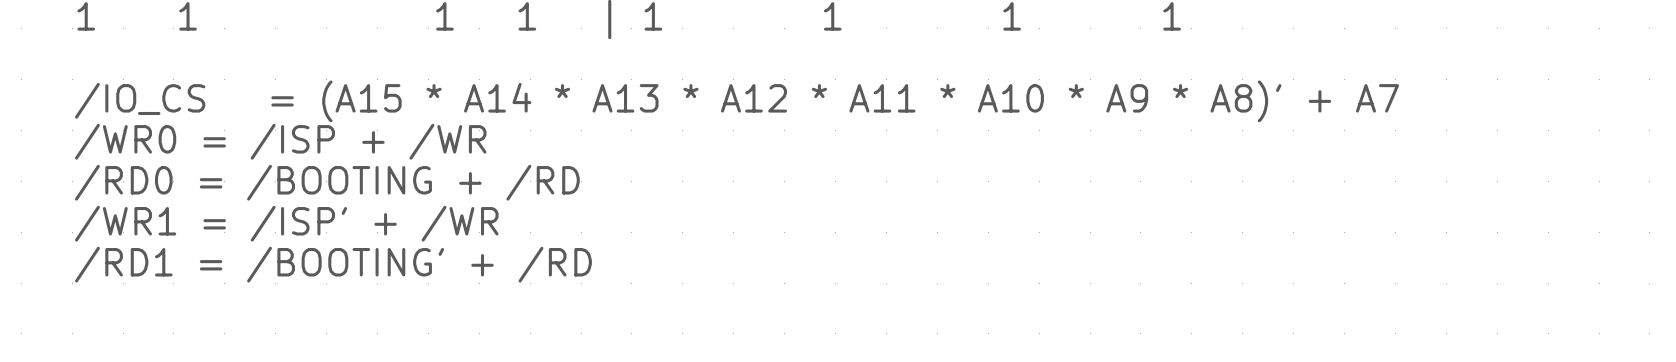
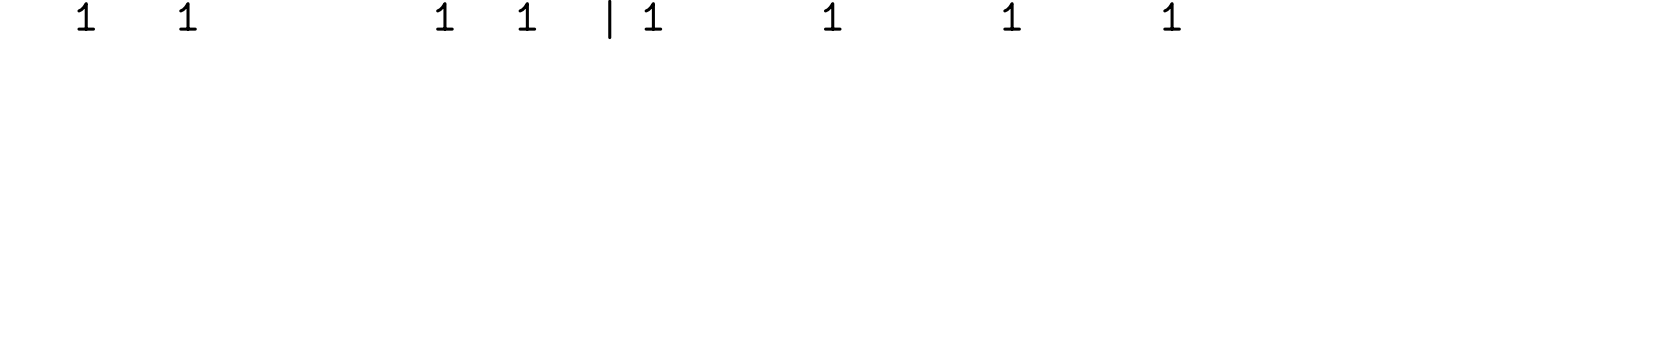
text: /IO_CS = (A15 * A14 * A13 * A12 * A11 * A10 * A9 * A8)' + A7 (737, 101) -> none
text: /WR0 = /ISP + /WR (280, 141) -> none
text: /RD0 = /BOOTING + /RD (327, 182) -> none
text: /WR1 = /ISP' + /WR (286, 223) -> none
text: /RD1 = /BOOTING' + /RD (333, 264) -> none

